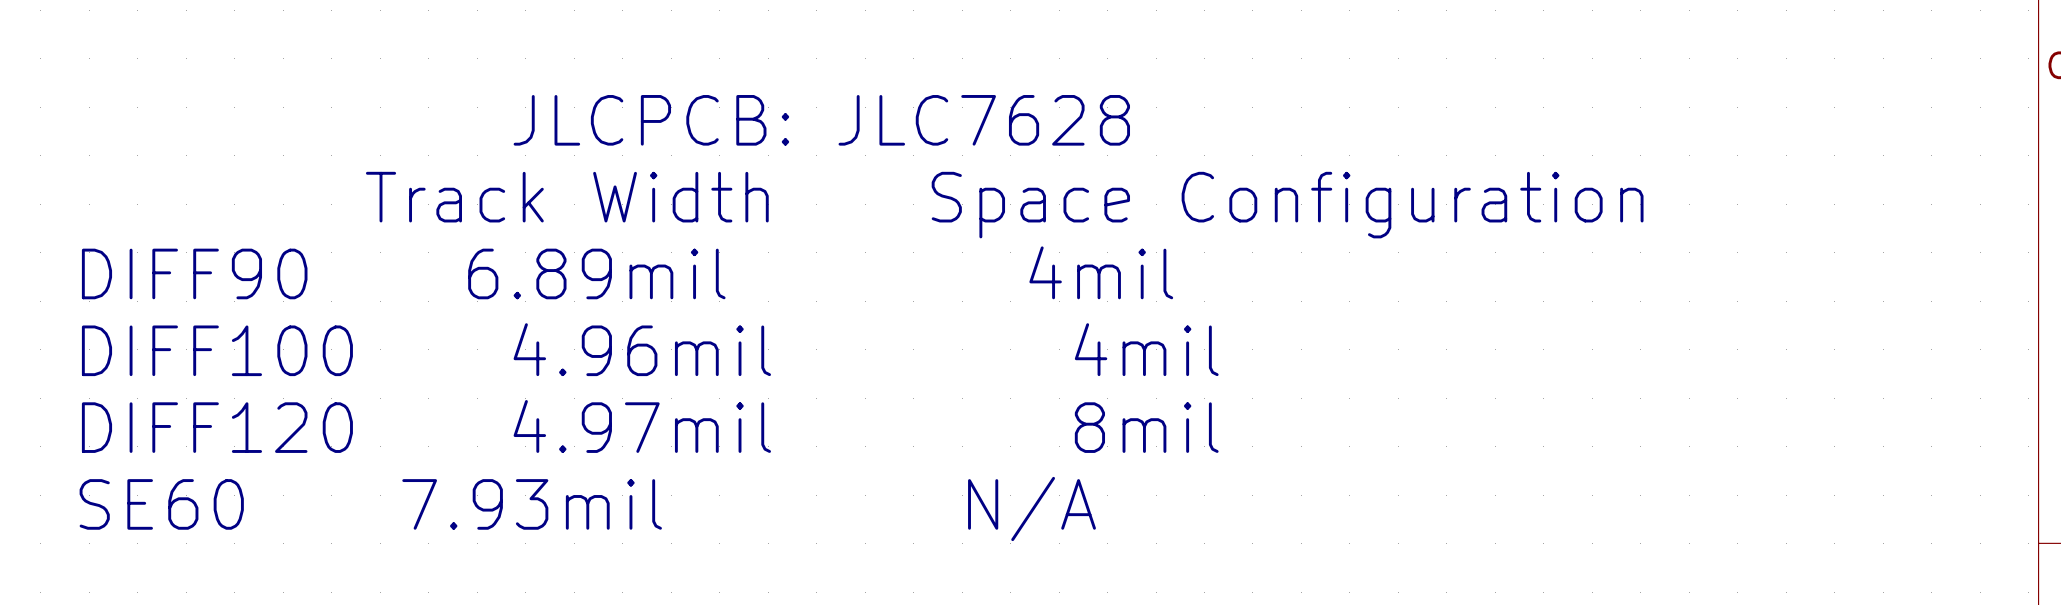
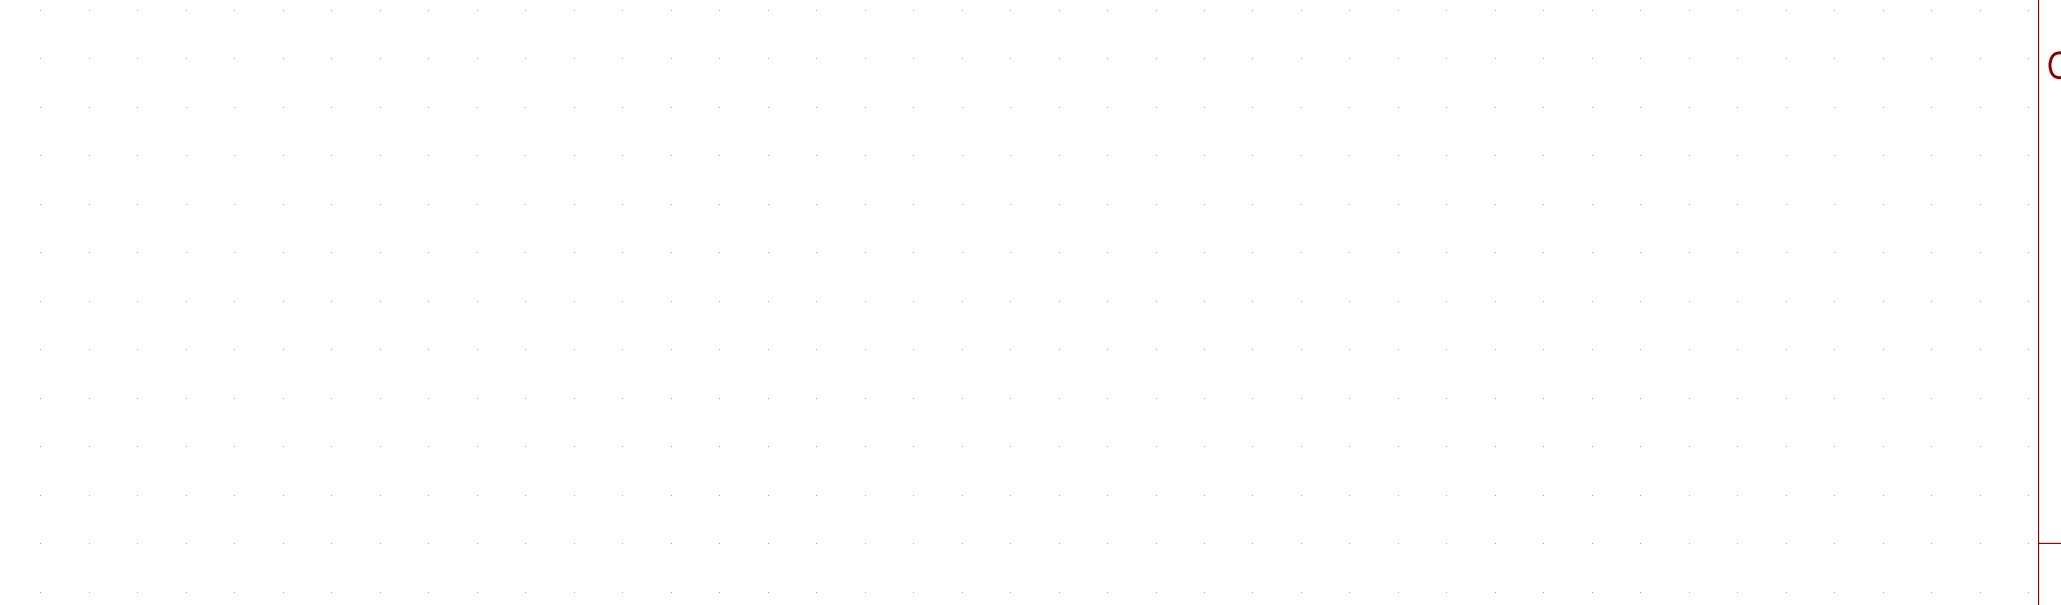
text: JLCPCB: JLC7628 (821, 120) -> none
text: Track Width Space Configuration (1004, 205) -> none
text: DIFF90 6.89mil 4mil (627, 272) -> none
text: DIFF100 4.96mil 4mil (650, 349) -> none
text: DIFF120 4.97mil 8mil (650, 426) -> none
text: SE60 7.93mil N/A (587, 508) -> none

